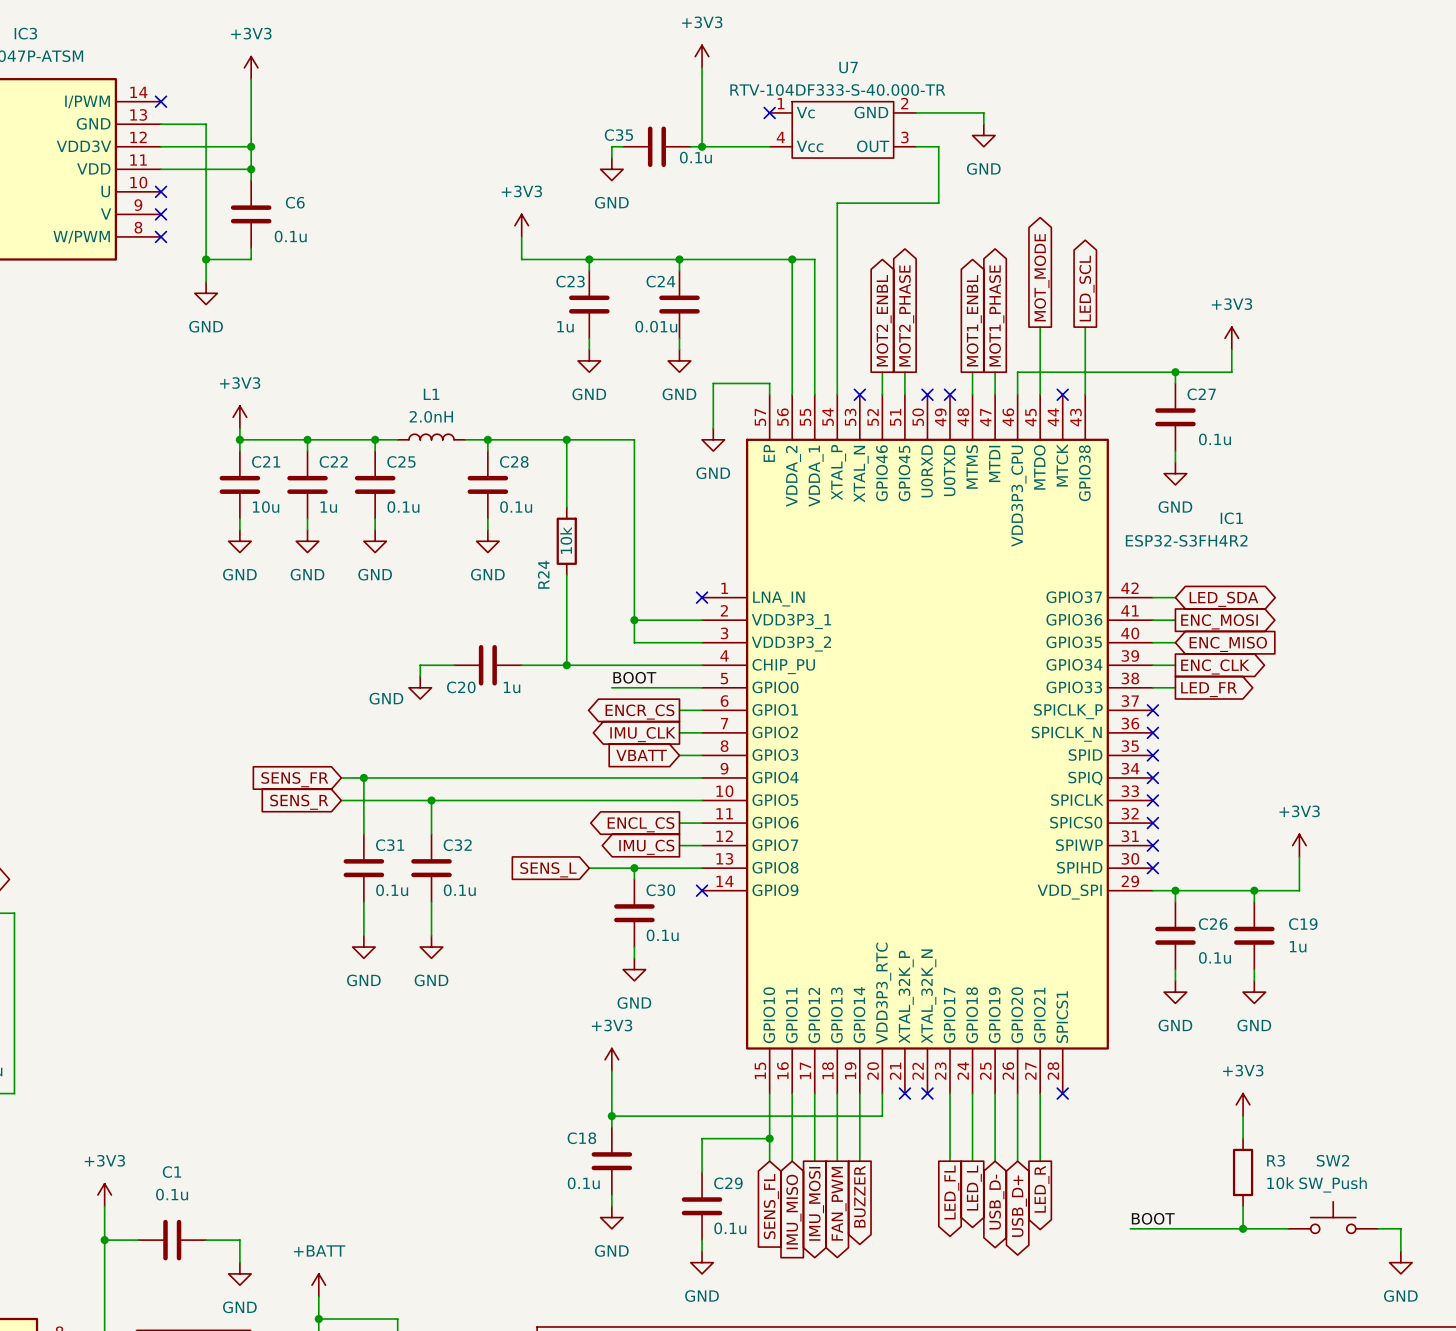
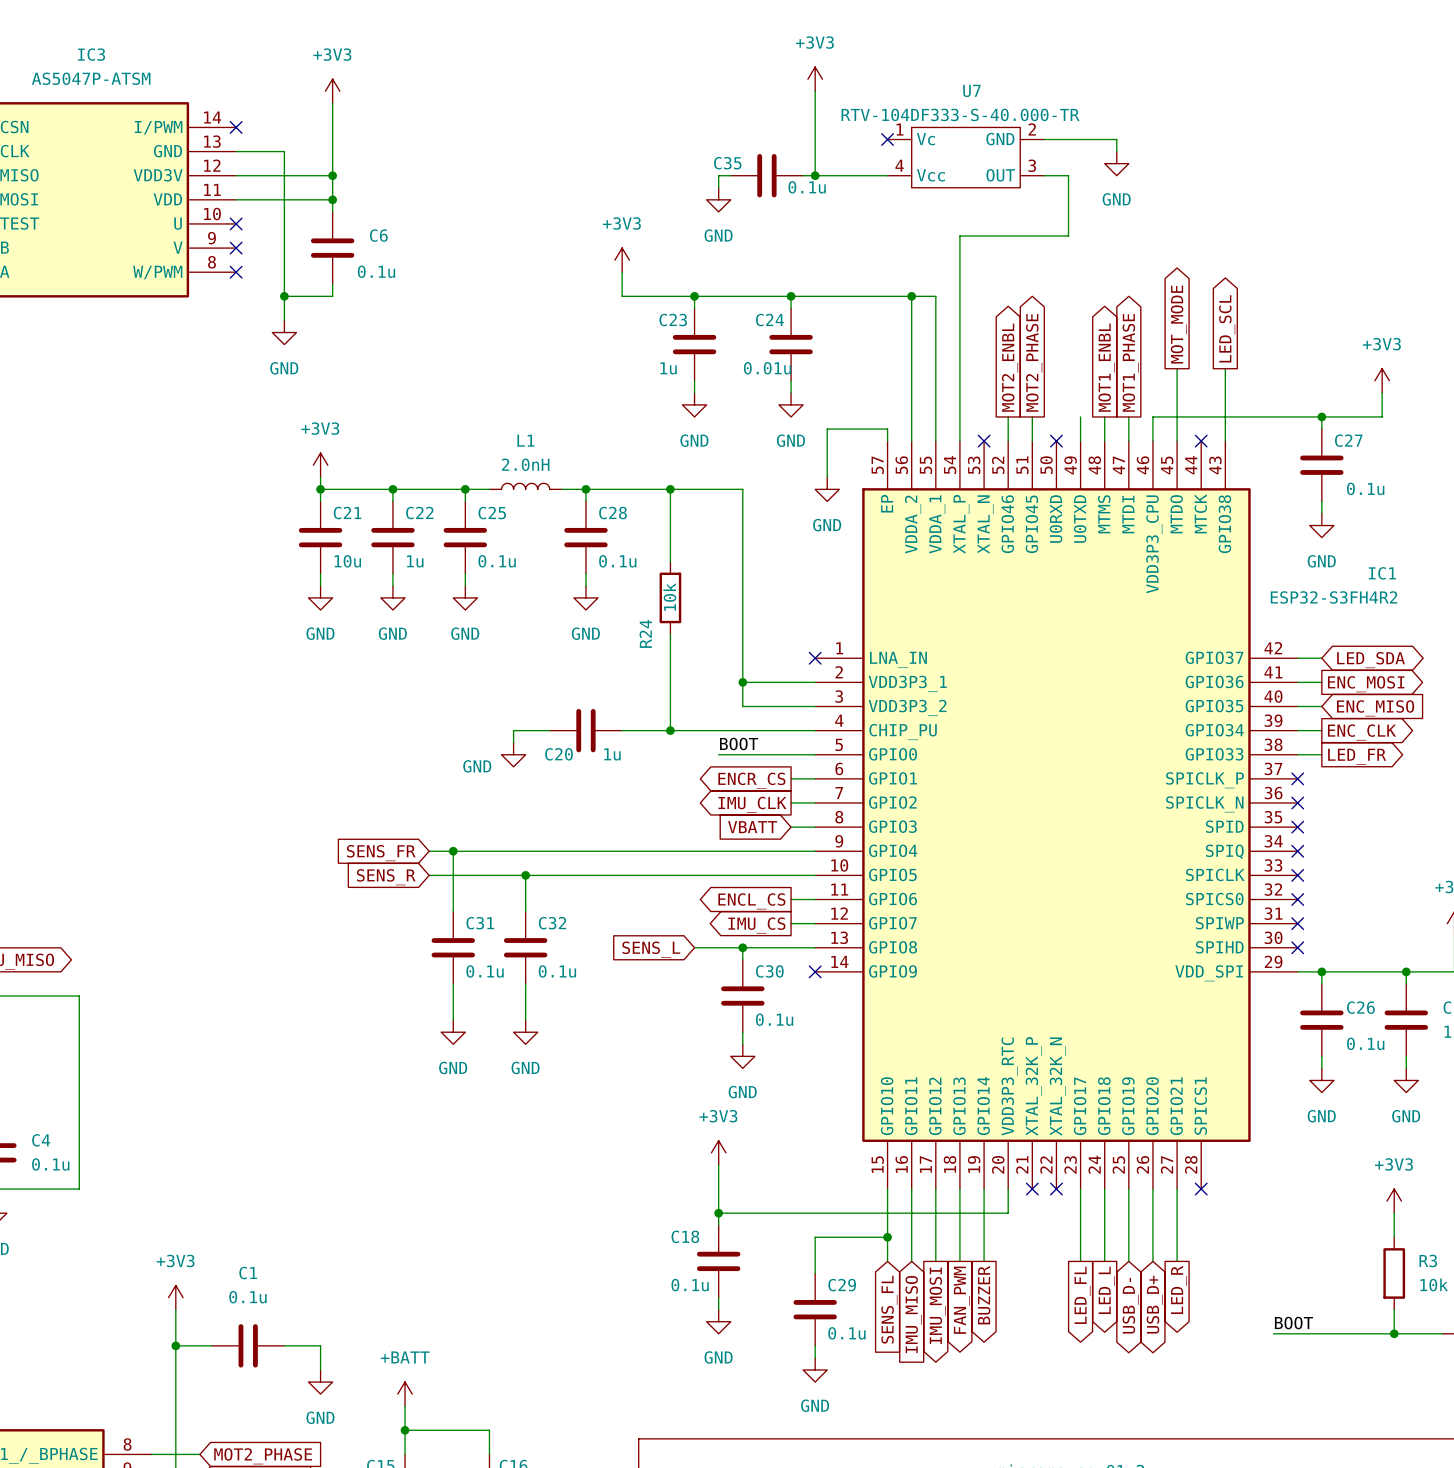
wire: none -> (1080, 416) (1080, 441)
no-connect mark: (950, 394) -> none

